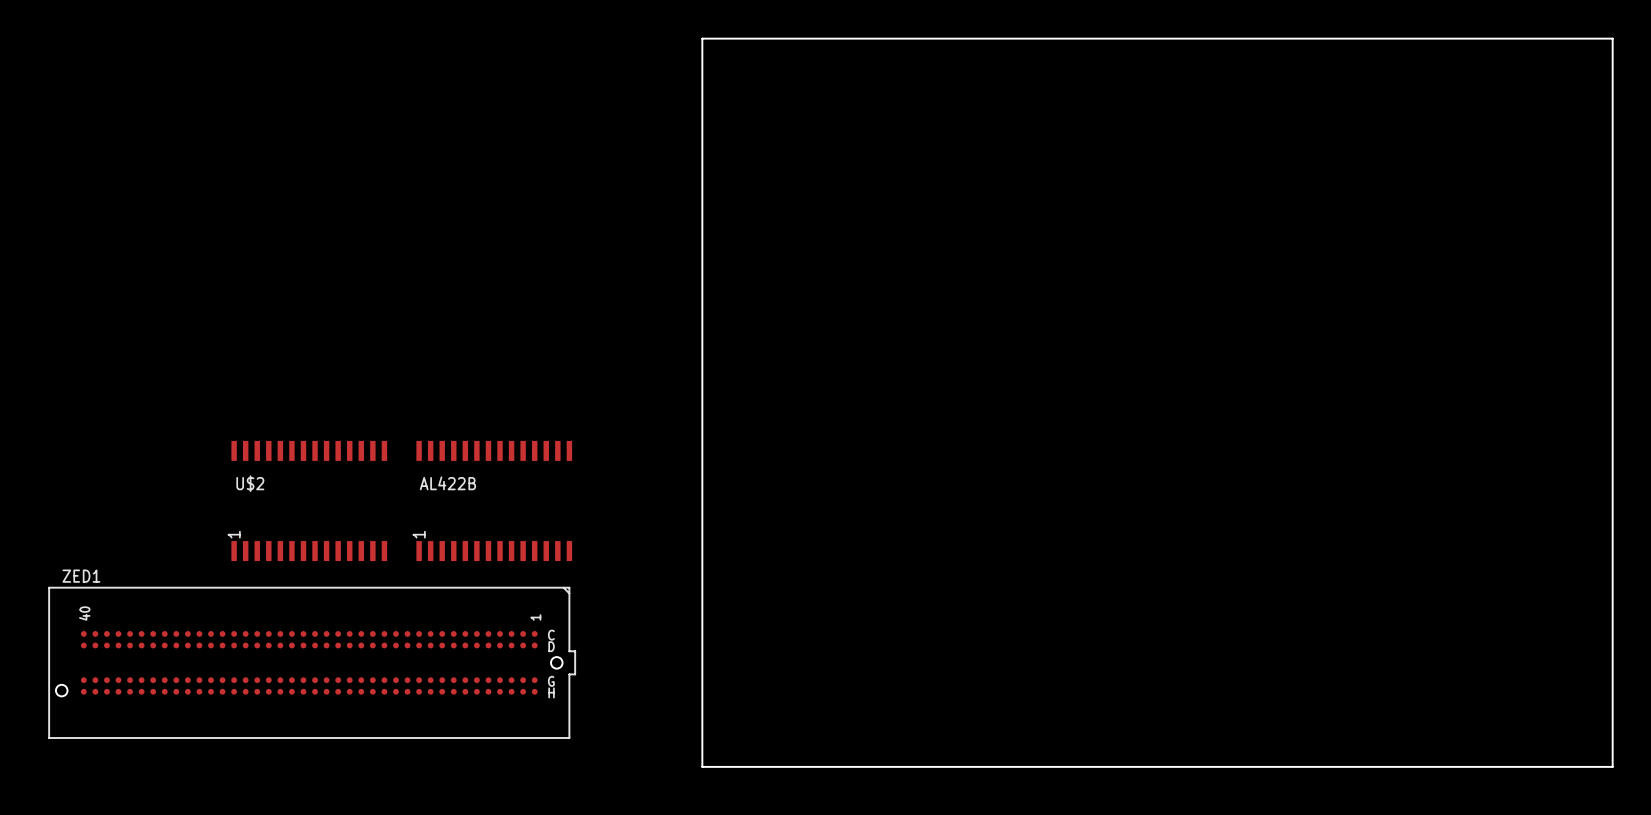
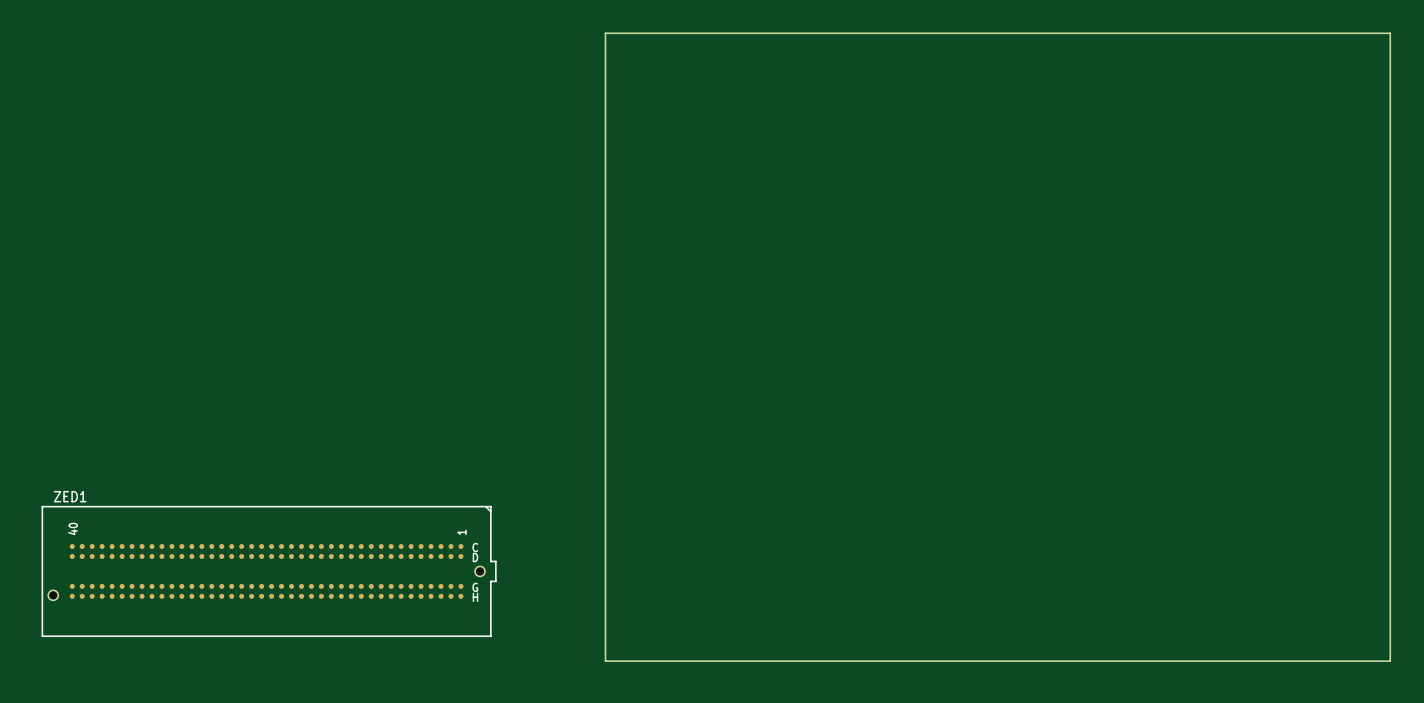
U$2: (309, 500) -> none
AL422B: (494, 500) -> none

